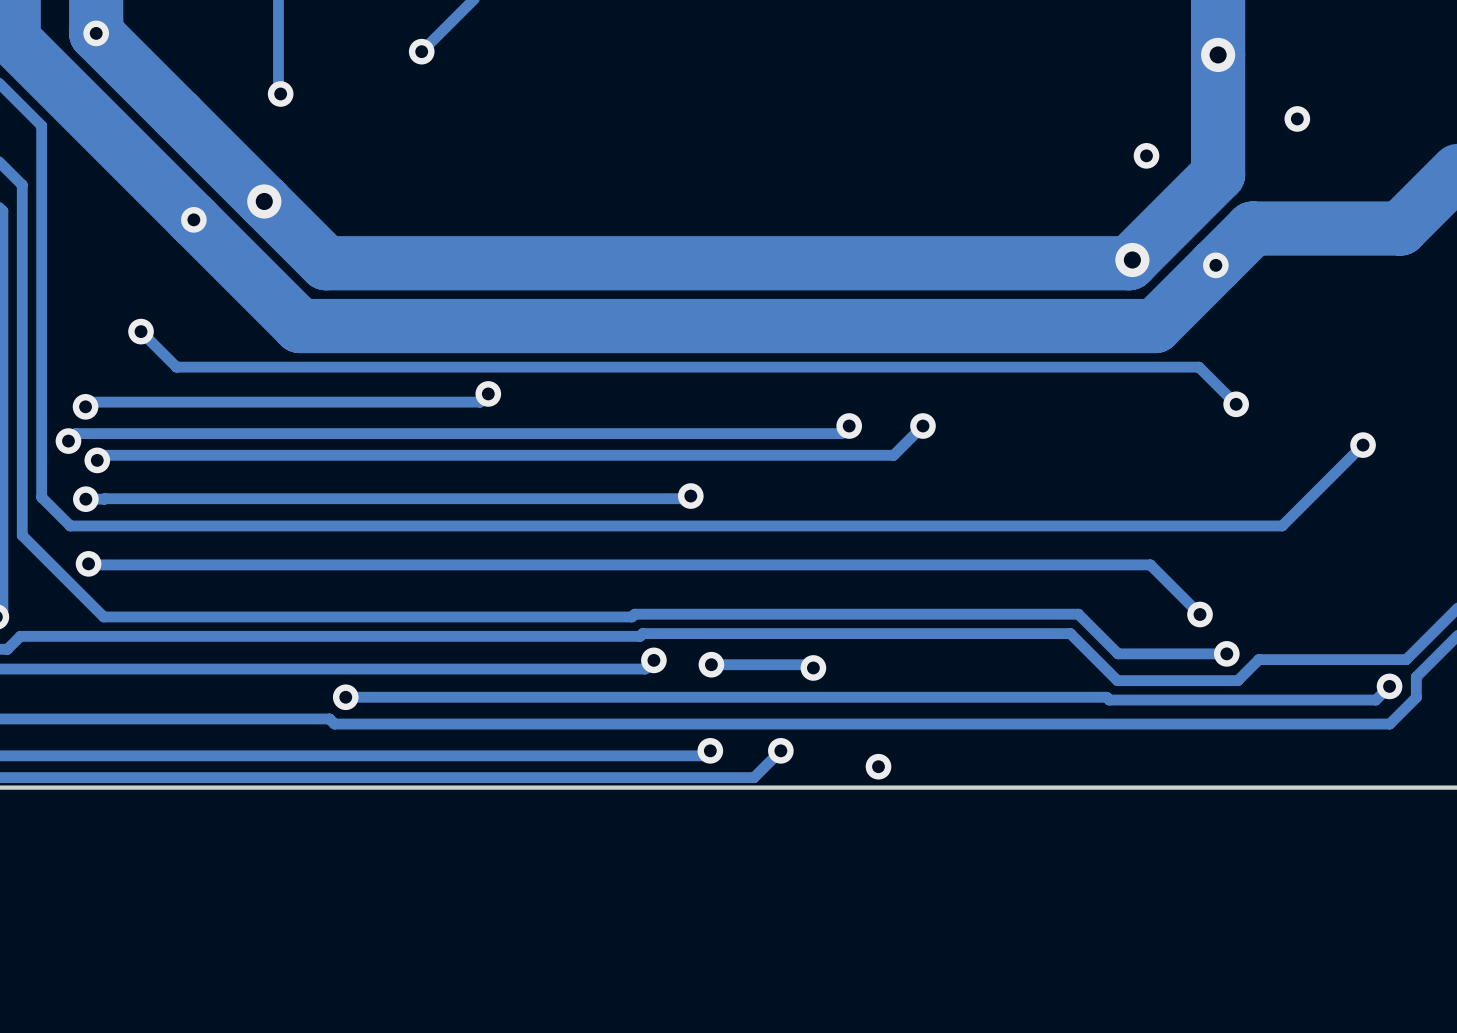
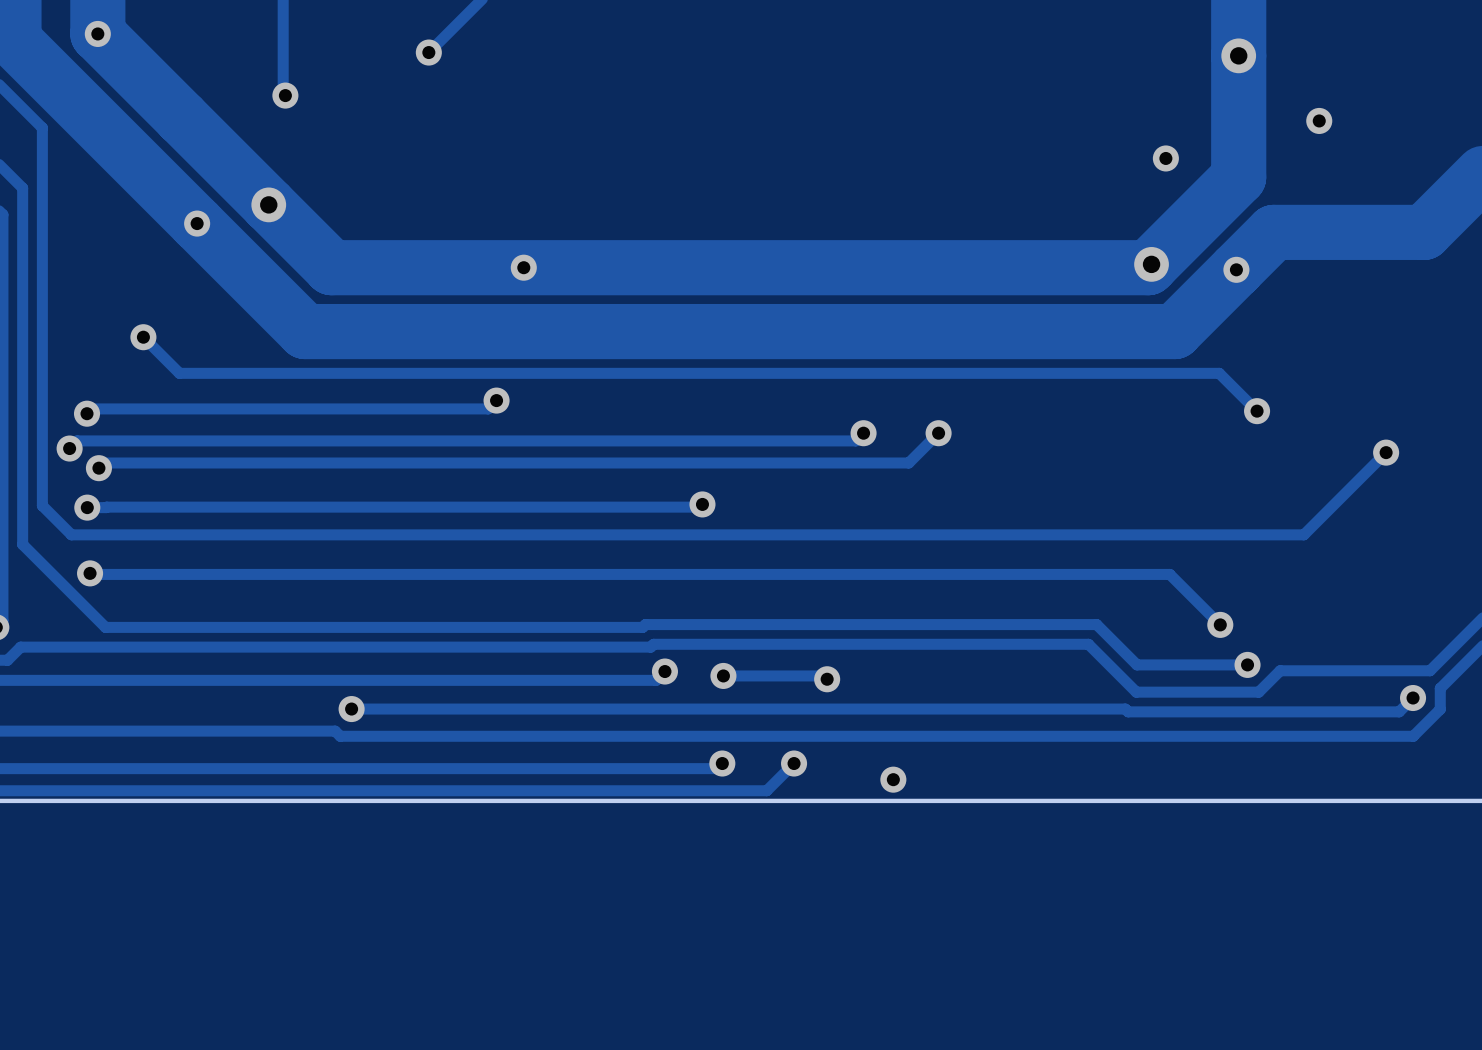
via: none -> (523, 267)

